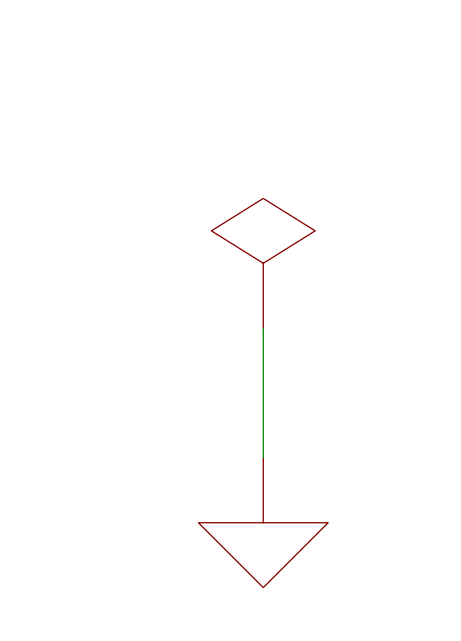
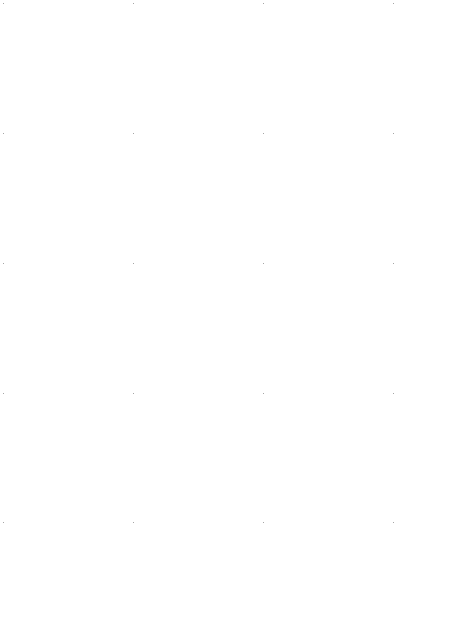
power symbol: (263, 263) -> none
wire: (263, 328) (263, 457) -> none
power symbol: (263, 522) -> none

